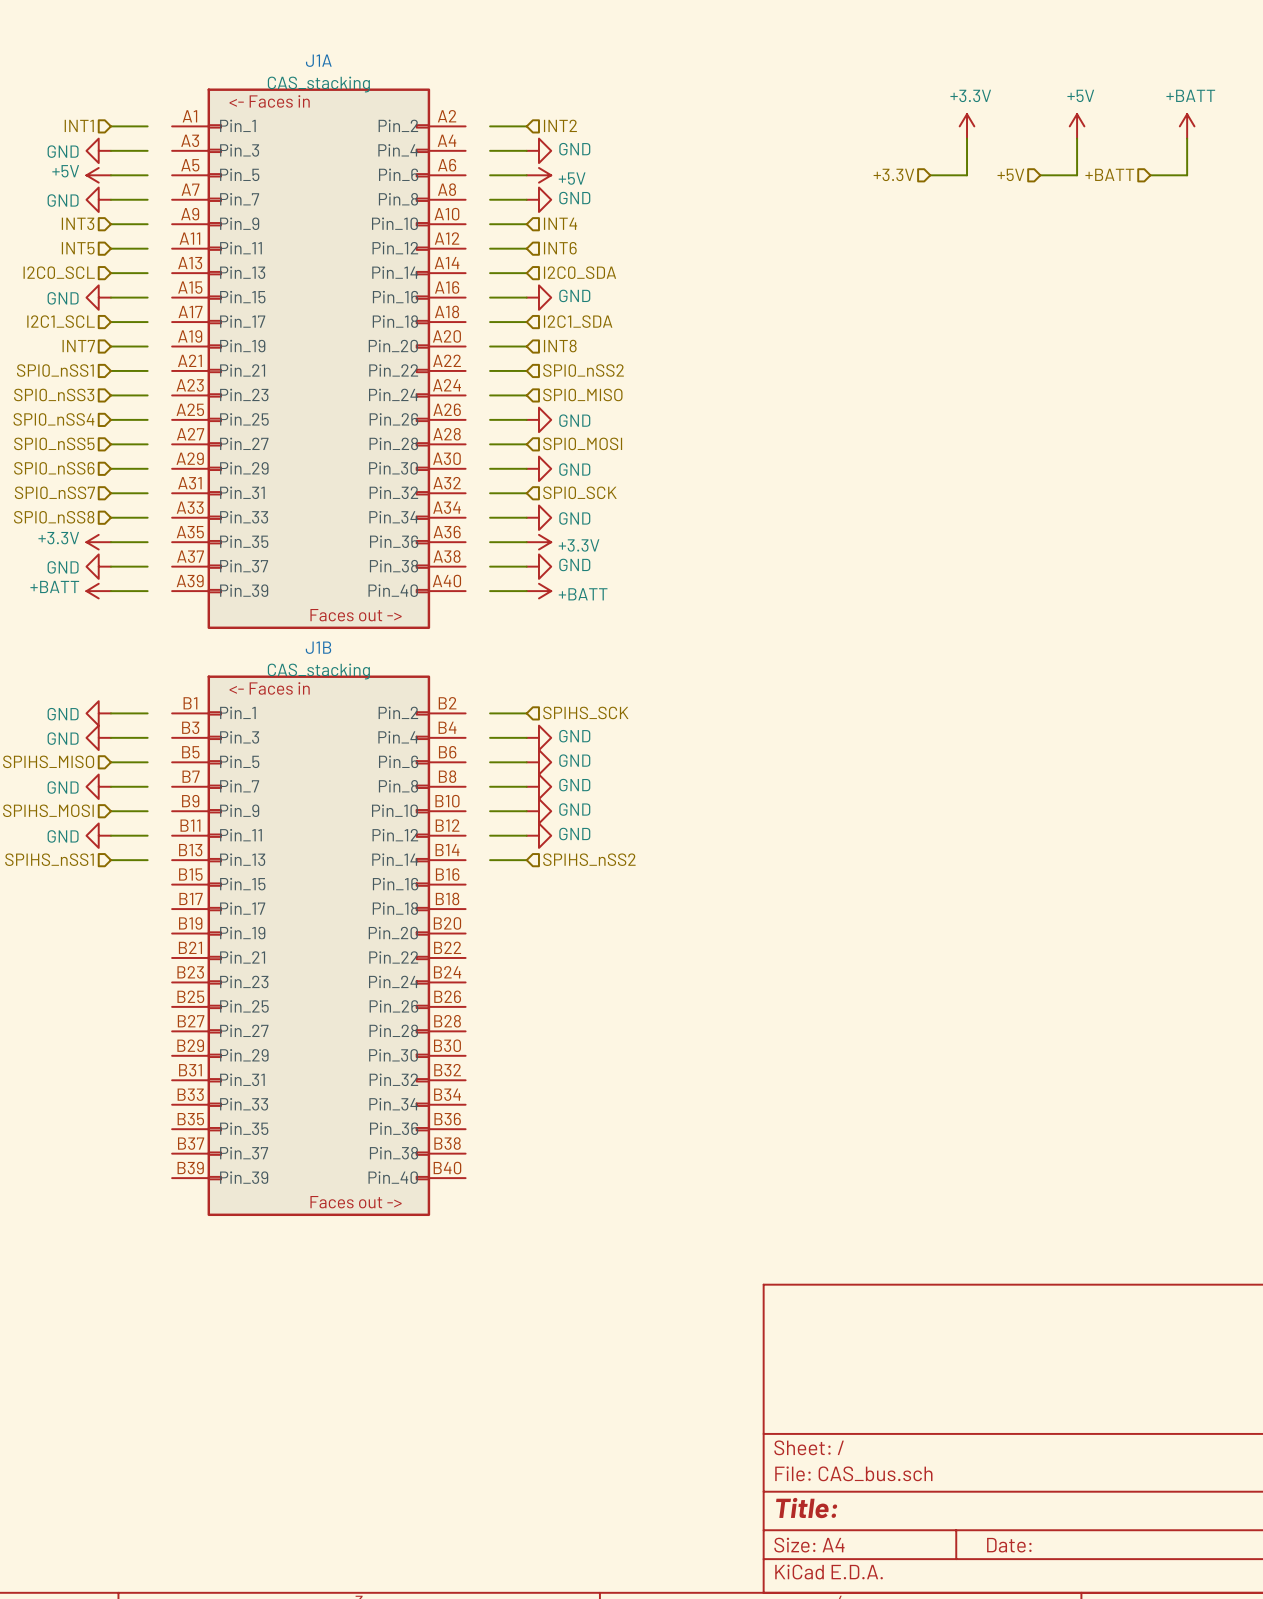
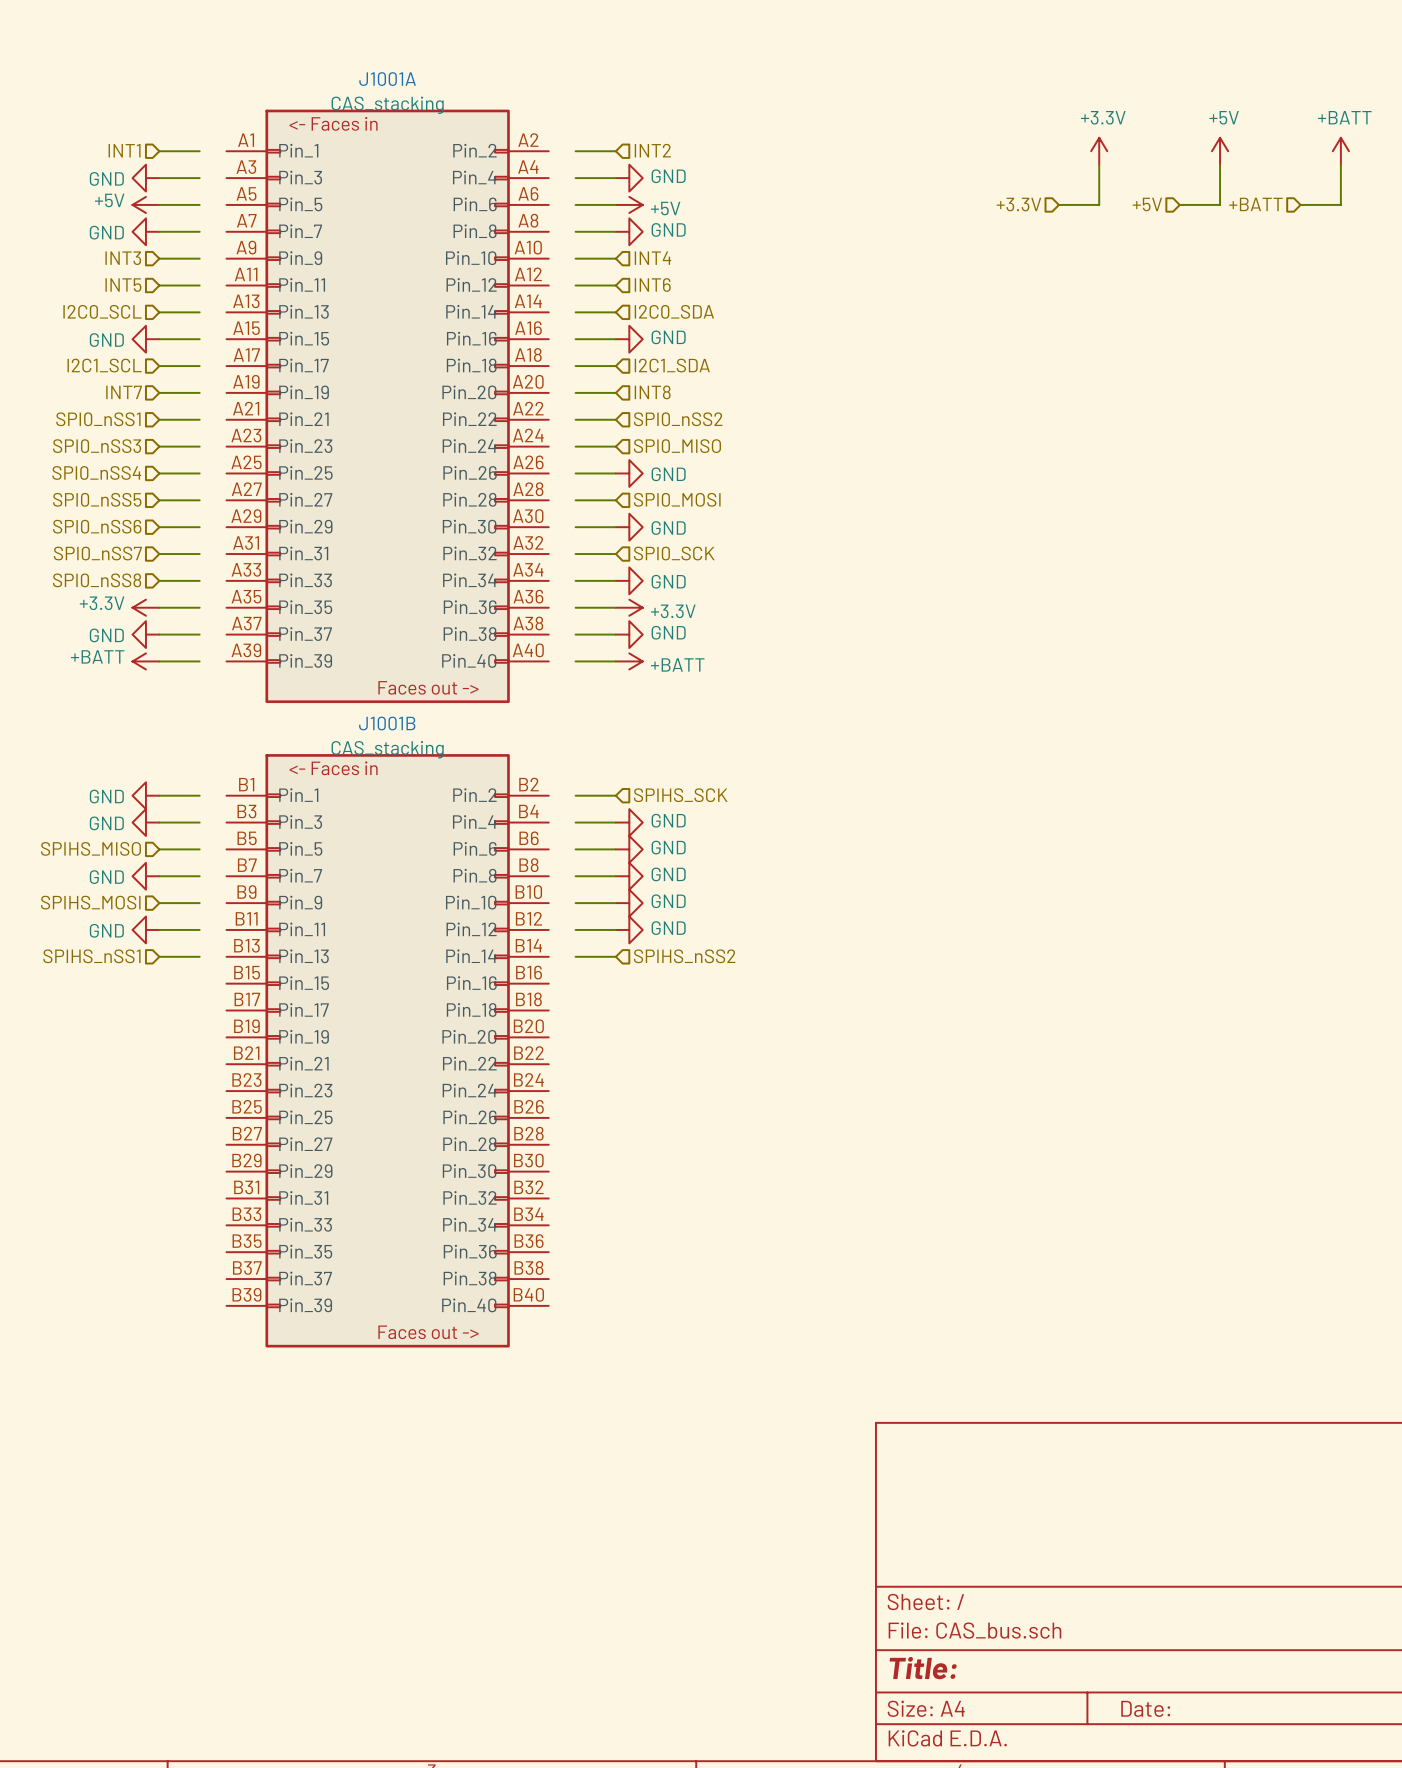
J1A name: J1A (318, 60) -> J1001A (387, 79)
J1B name: J1B (318, 647) -> J1001B (387, 723)

